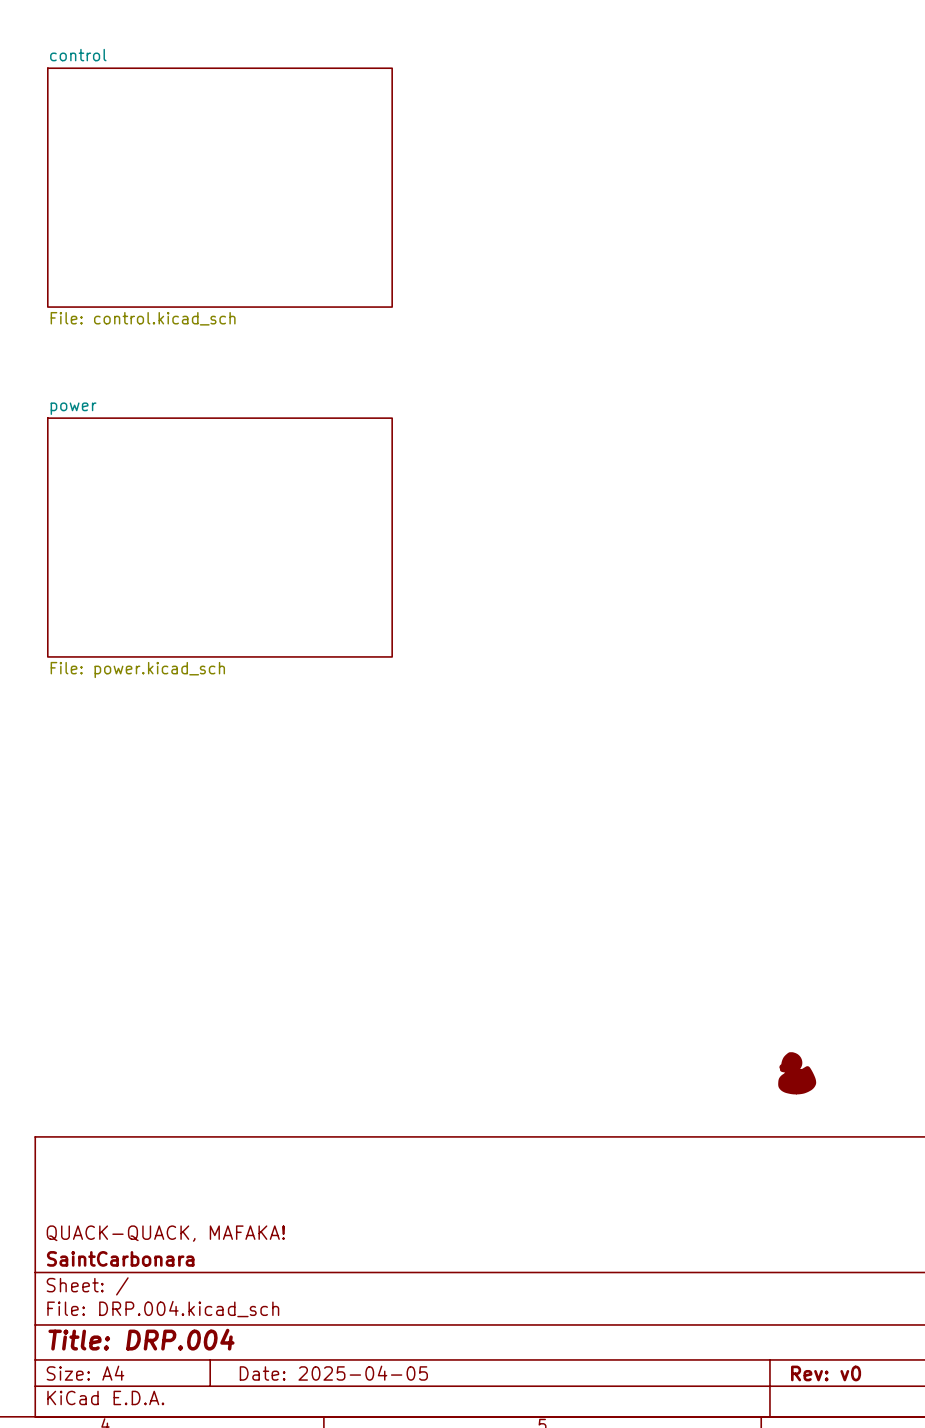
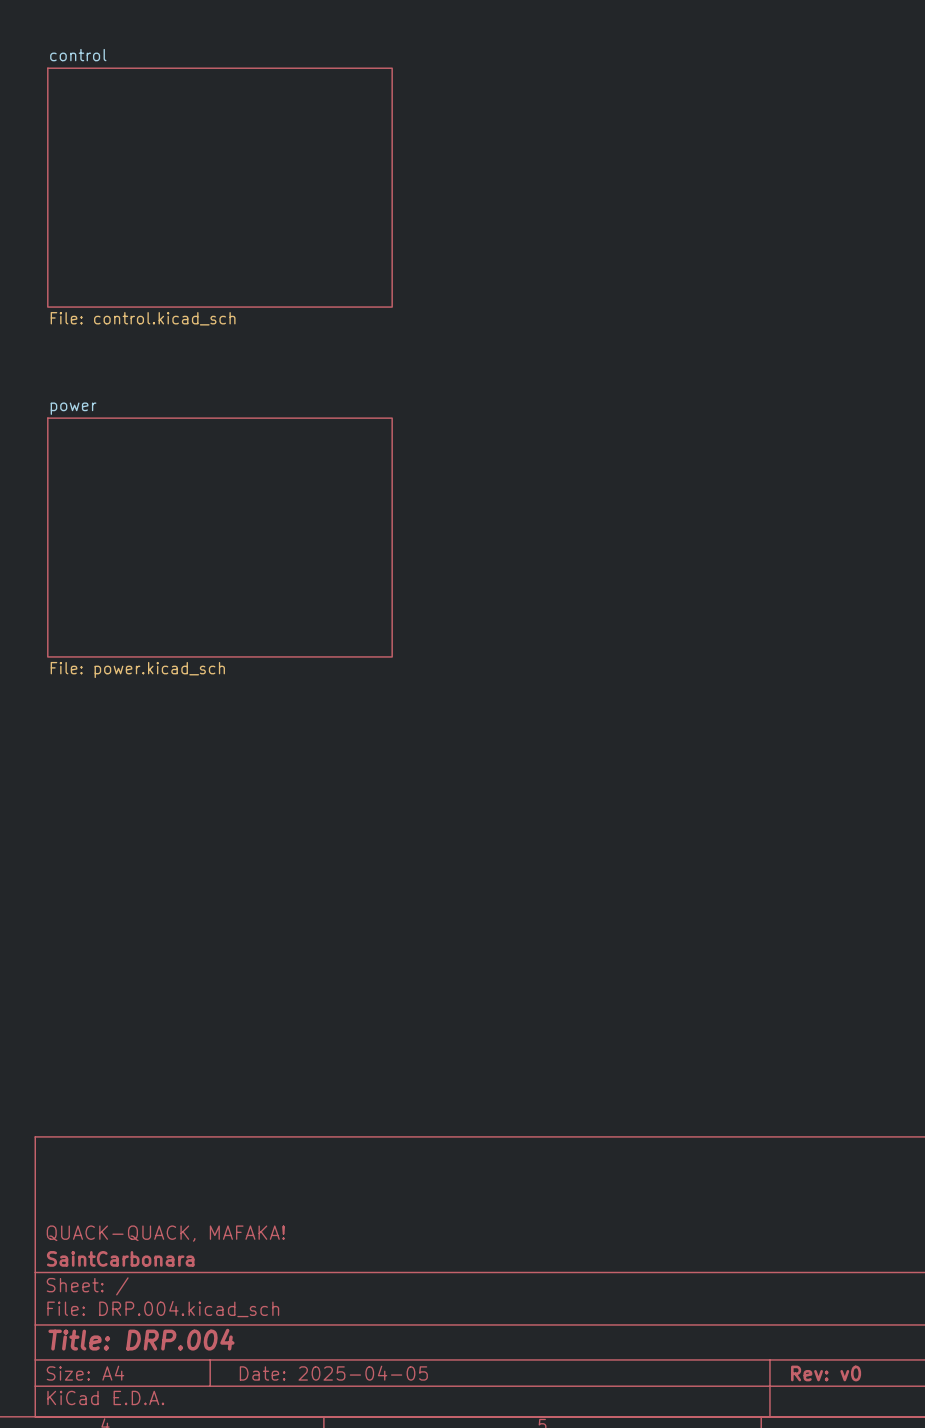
power symbol: (797, 1073) -> none

